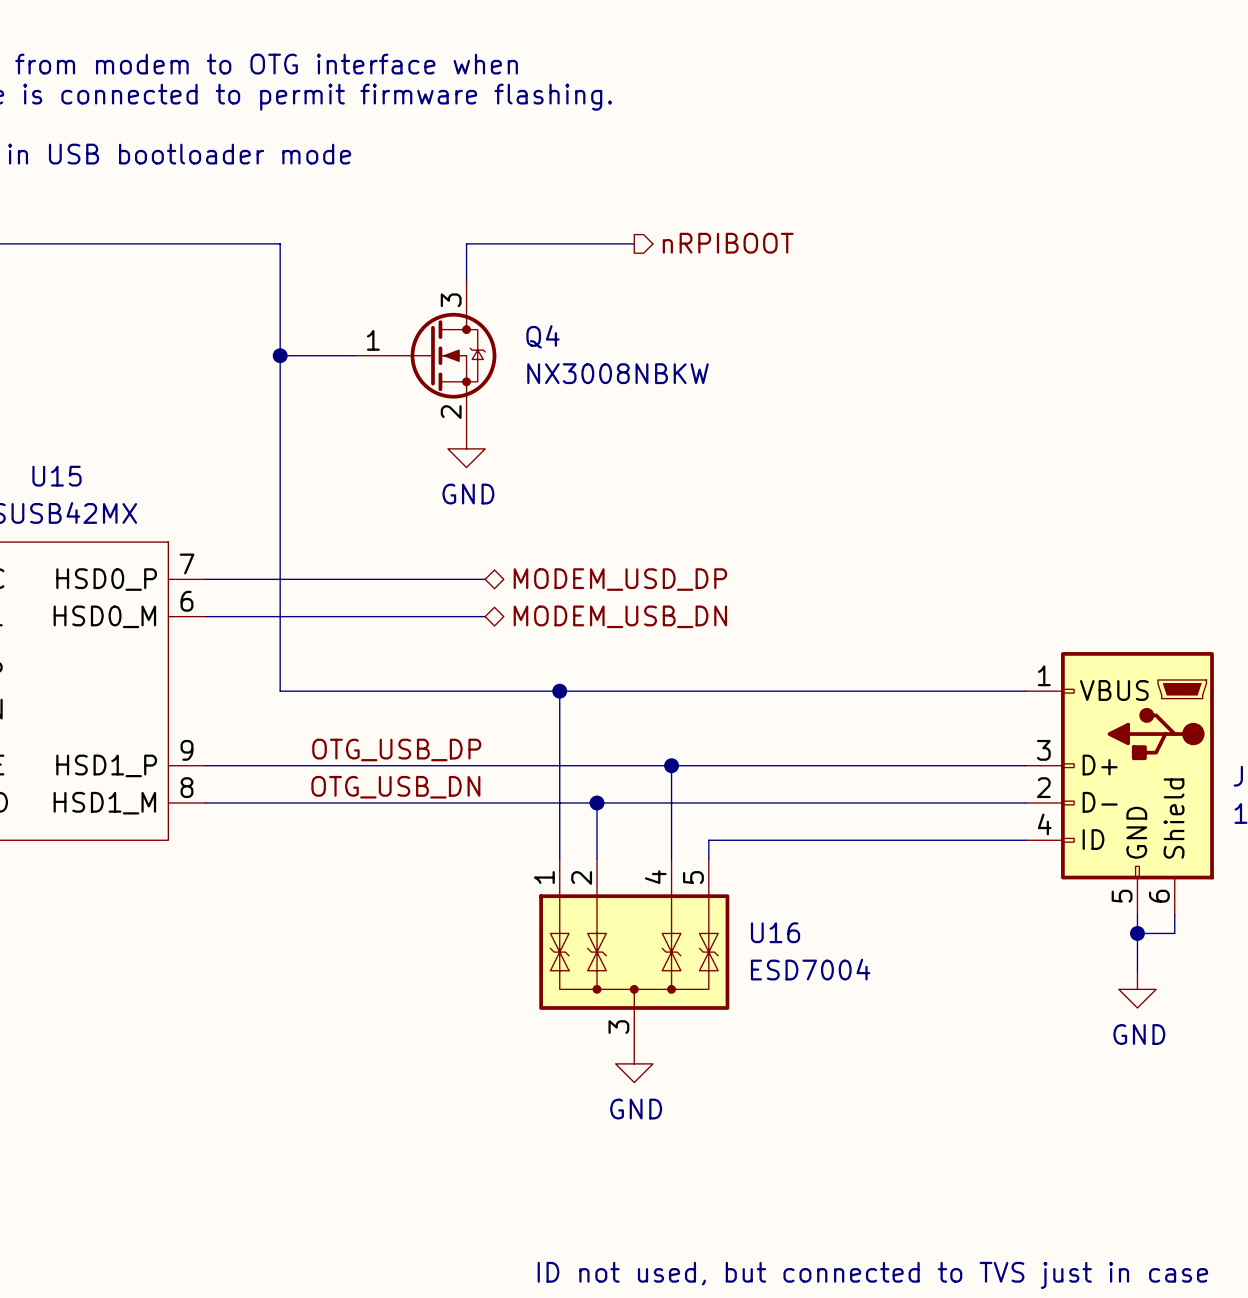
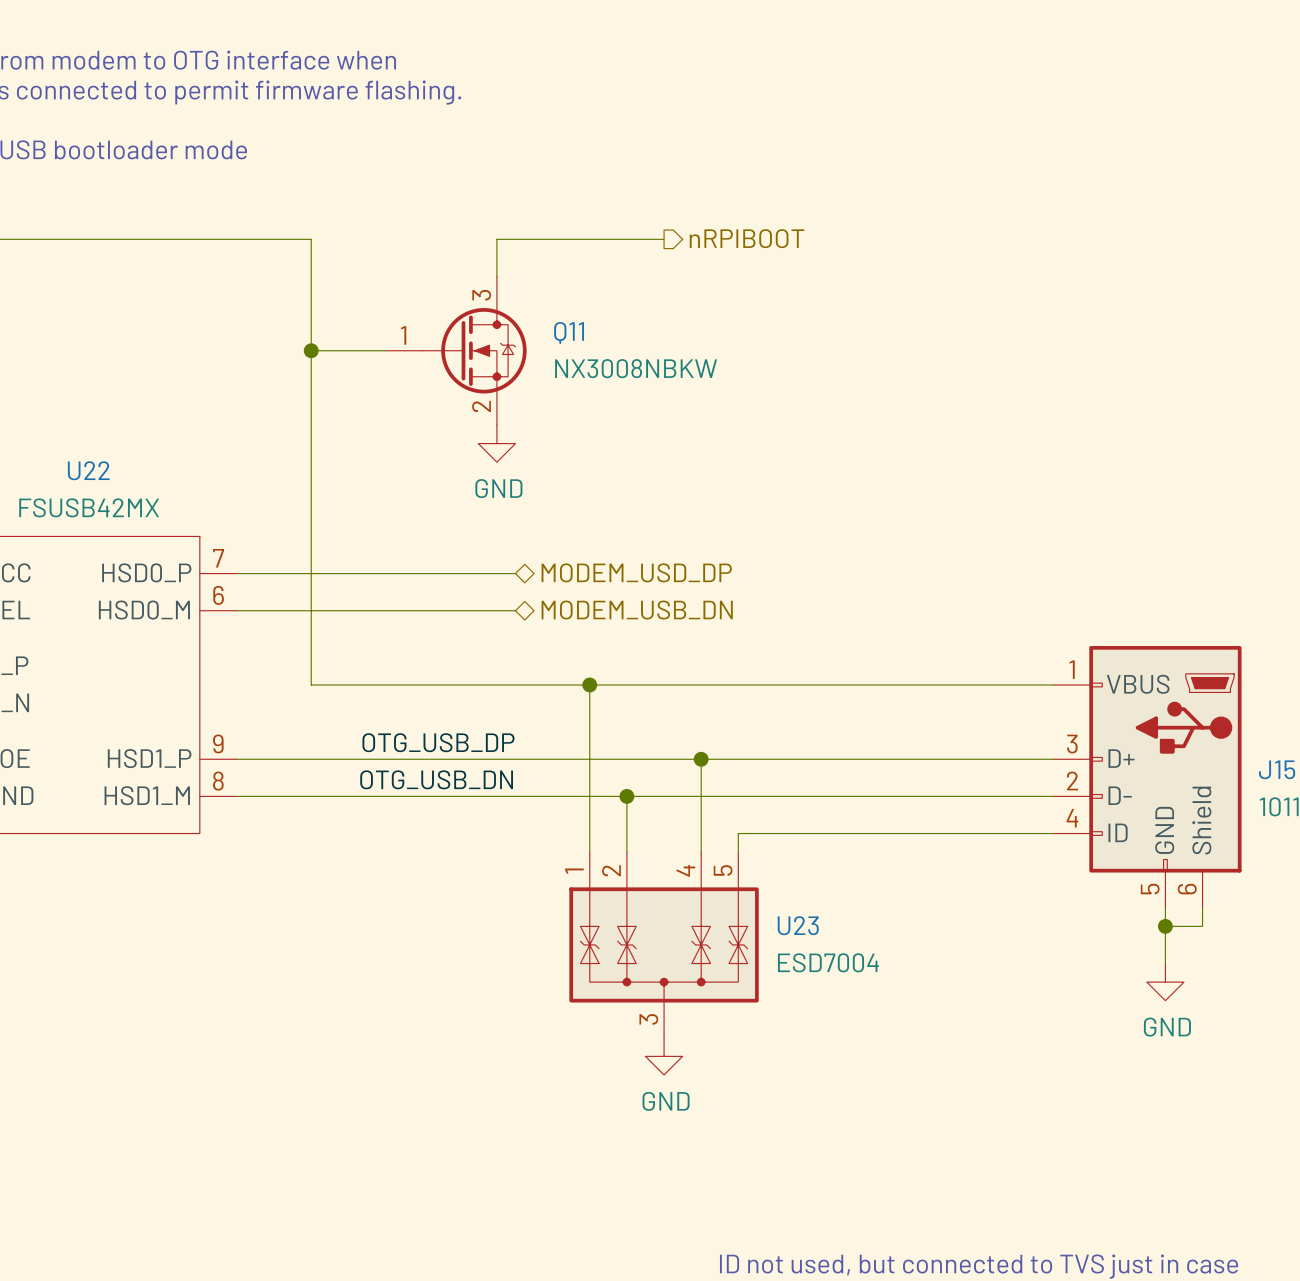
Q4 name: Q4 (543, 336) -> Q11 (569, 332)
U15 name: U15 (56, 476) -> U22 (88, 470)
U16 name: U16 (775, 932) -> U23 (798, 925)

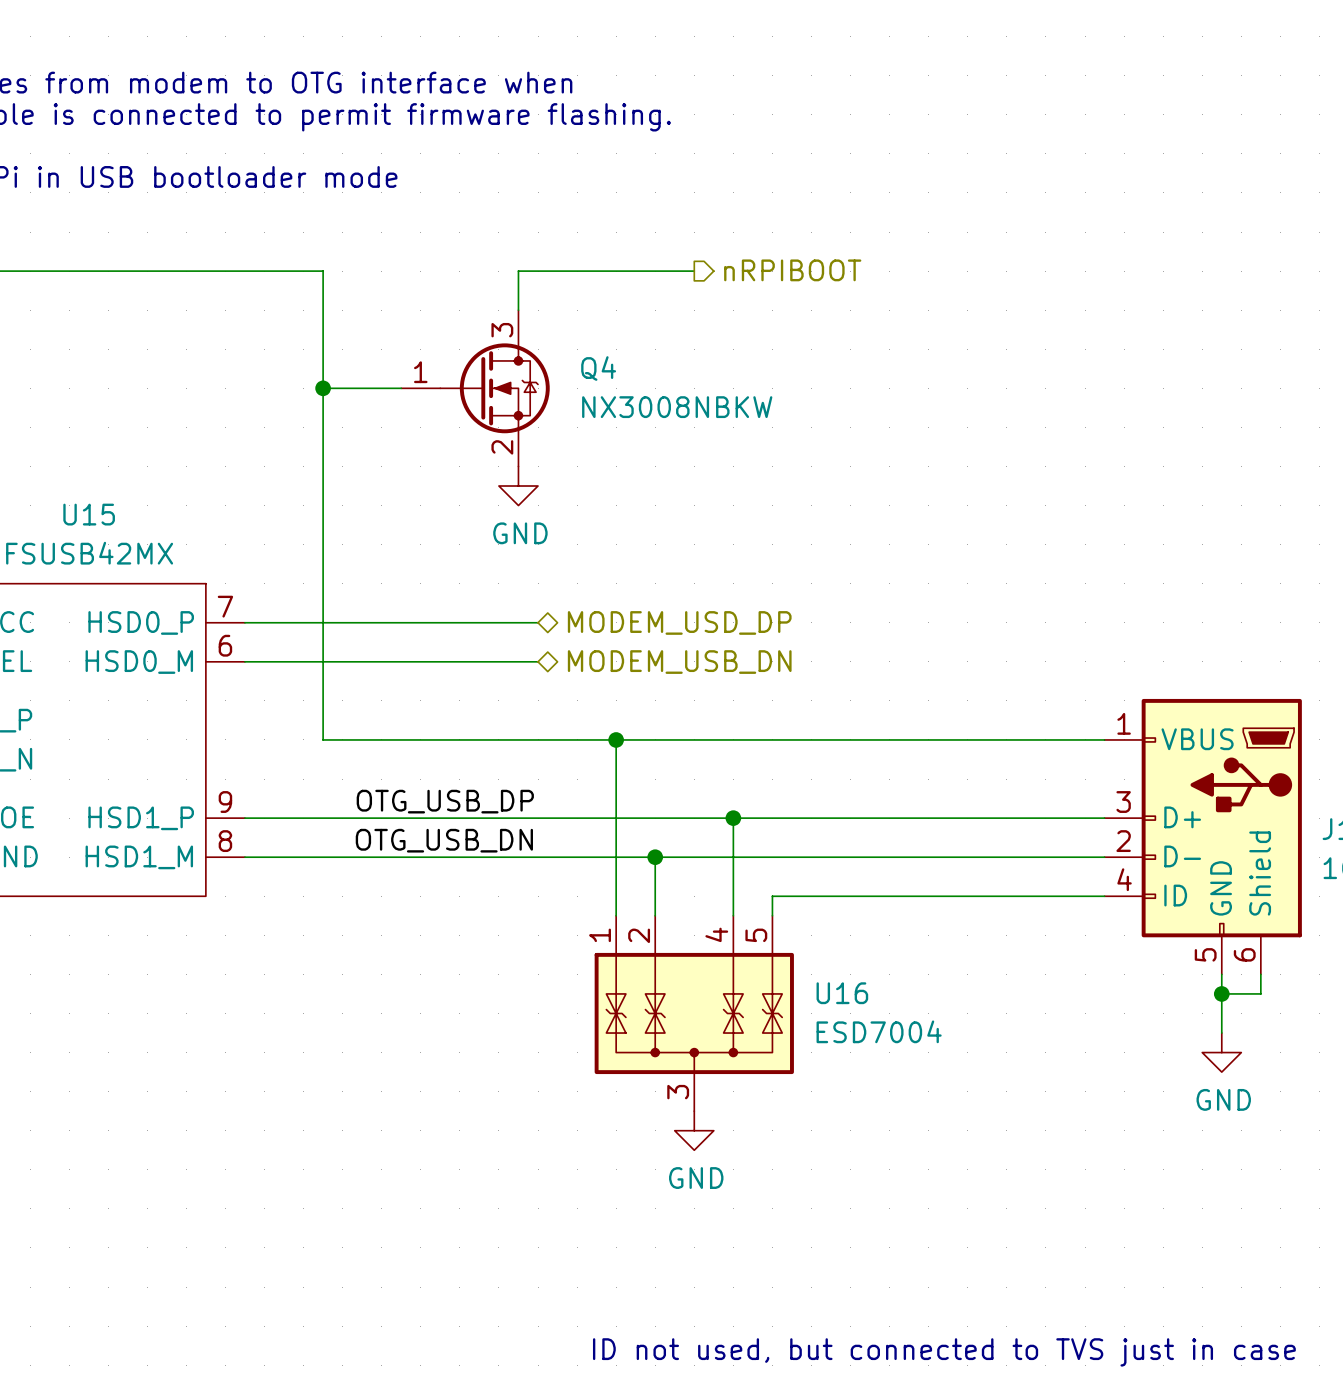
Q11 name: Q11 (569, 332) -> Q4 (598, 368)
U22 name: U22 (88, 470) -> U15 (89, 514)
U23 name: U23 (798, 925) -> U16 (842, 993)

